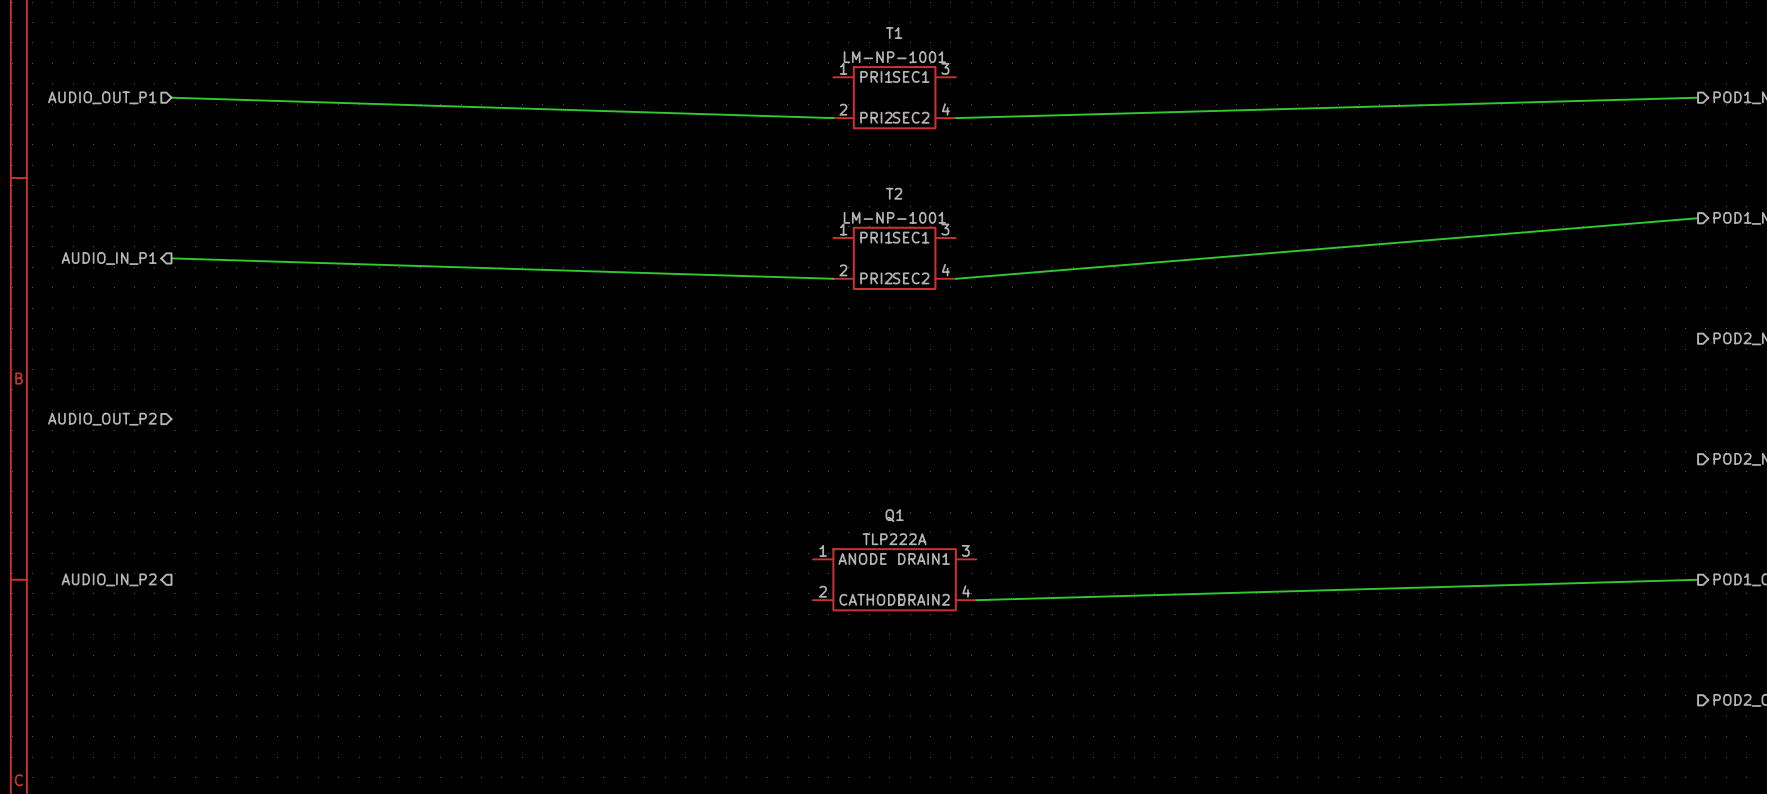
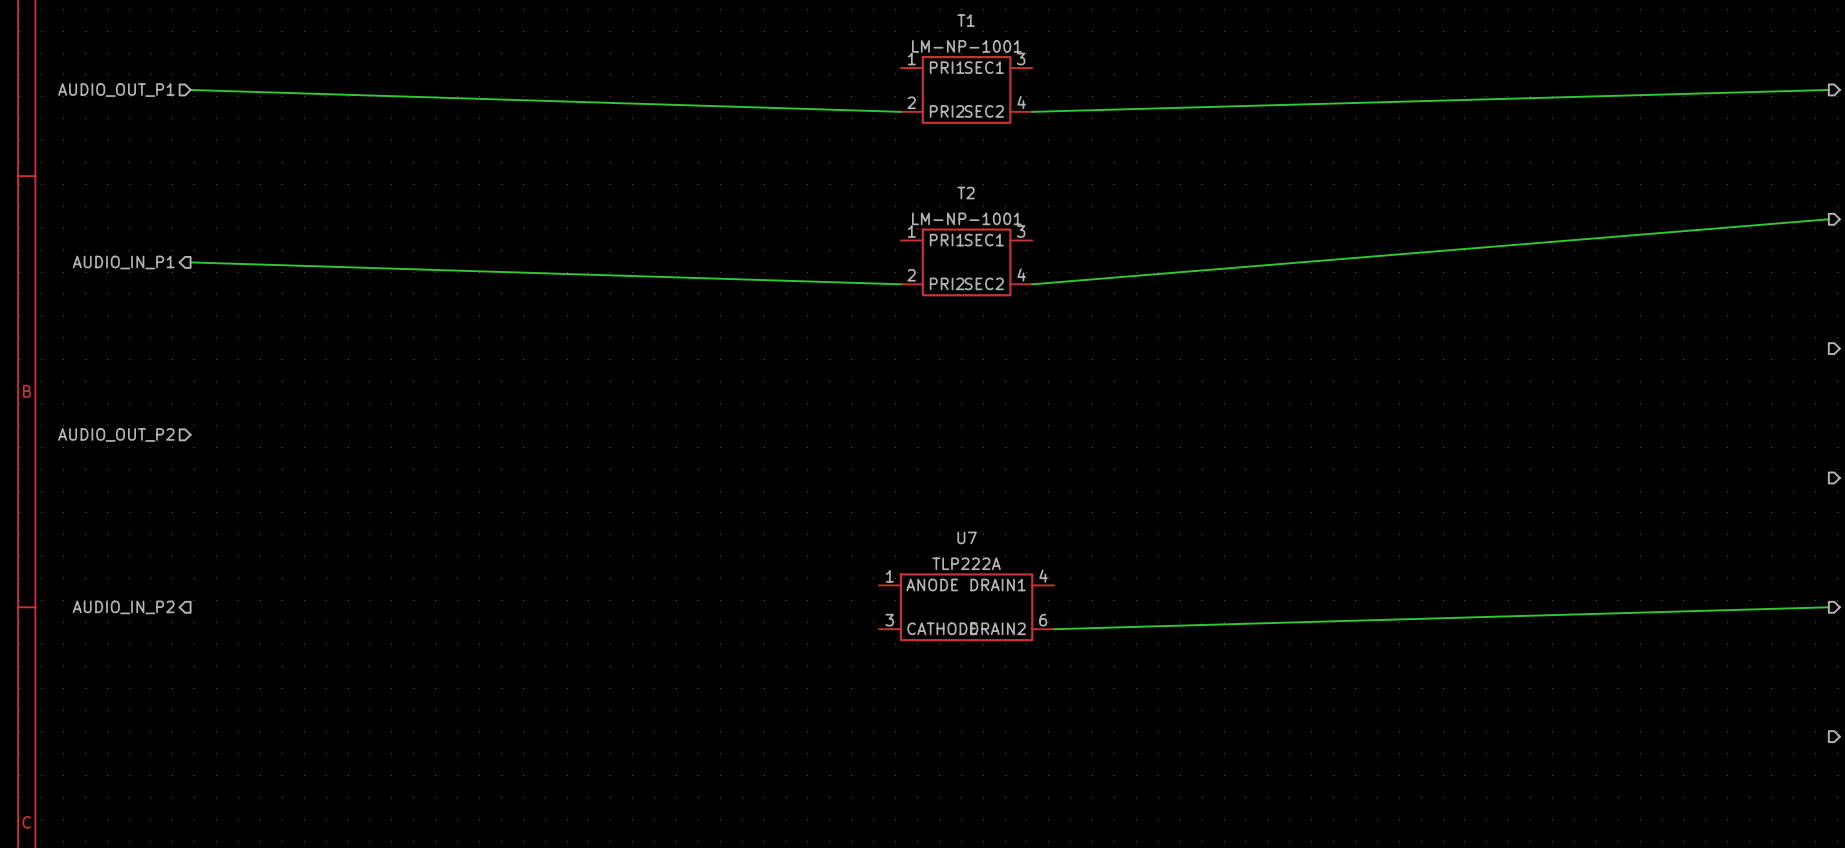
Q1 name: Q1 (894, 515) -> U7 (967, 537)
Q1 pin number: 3 (965, 550) -> 4 (1043, 576)
Q1 pin number: 2 (822, 591) -> 3 (889, 620)
Q1 pin number: 4 (966, 591) -> 6 (1043, 620)

